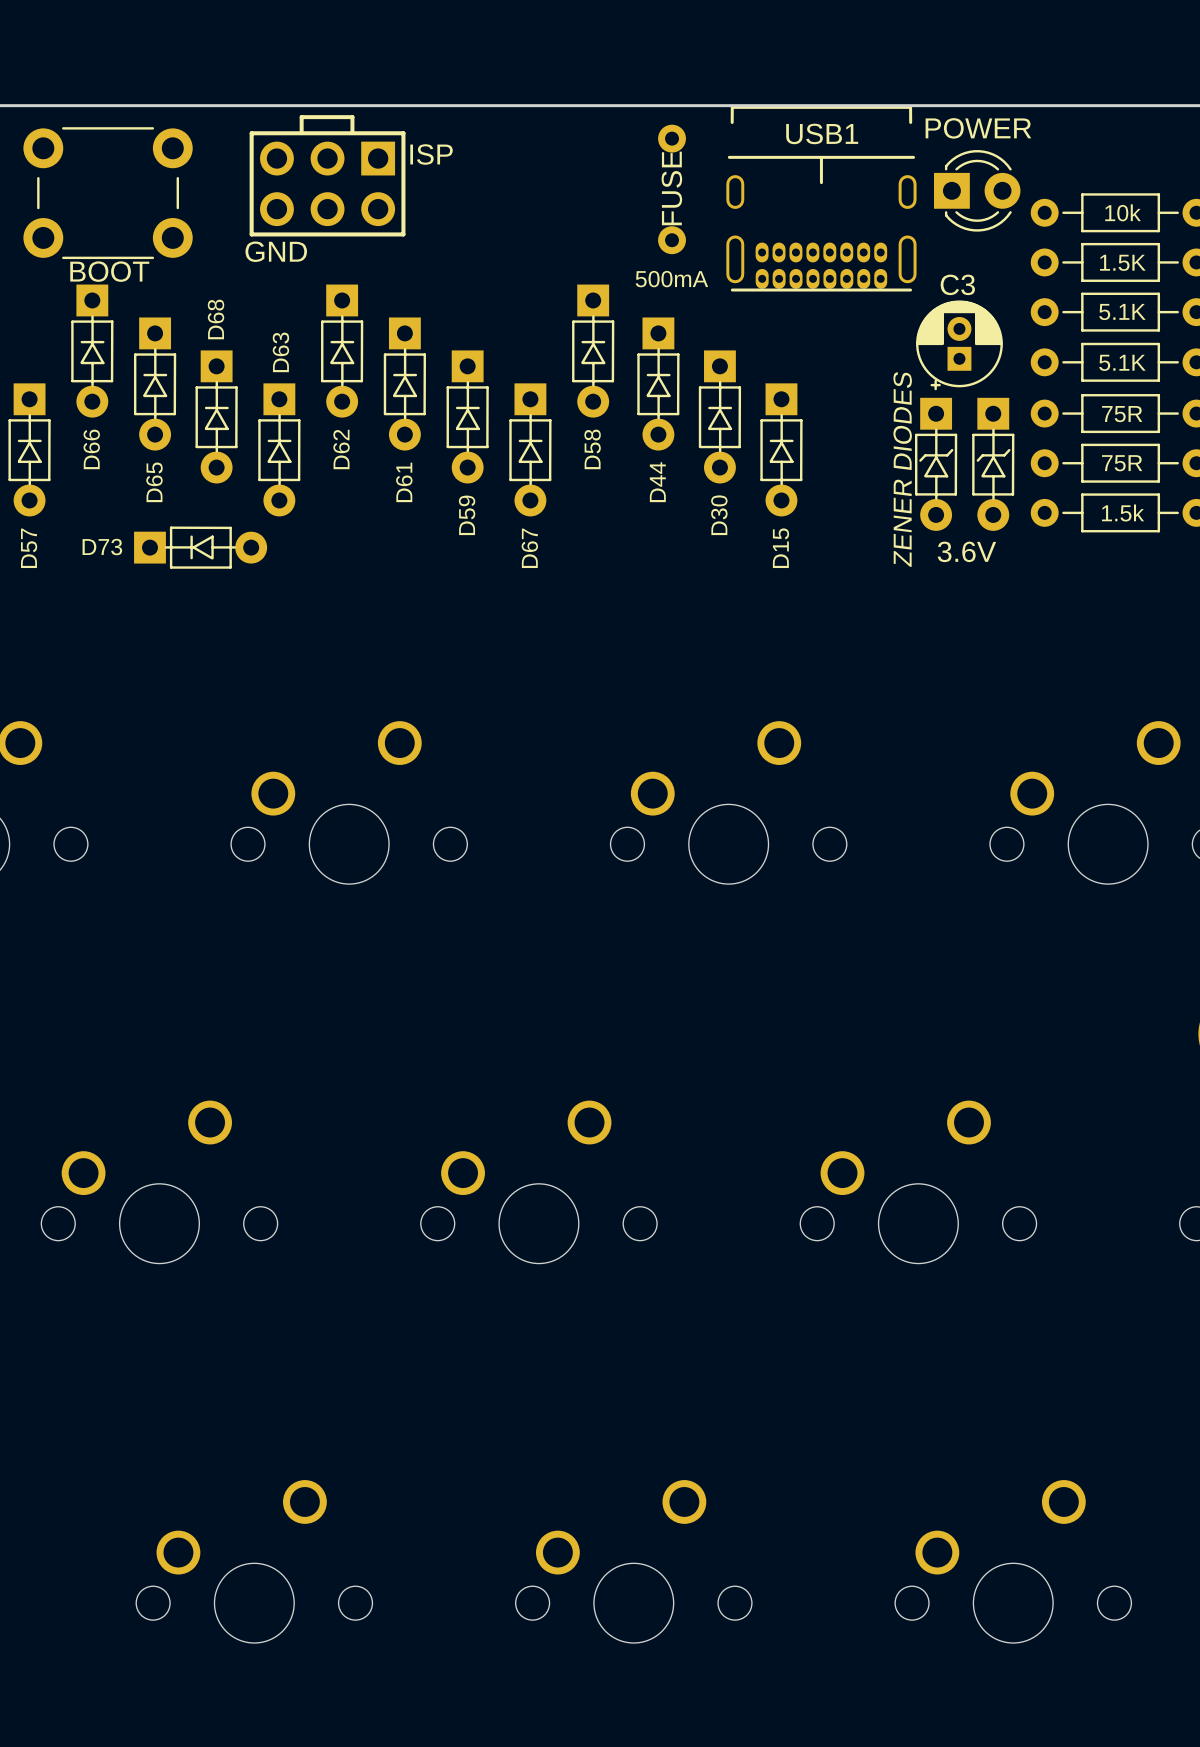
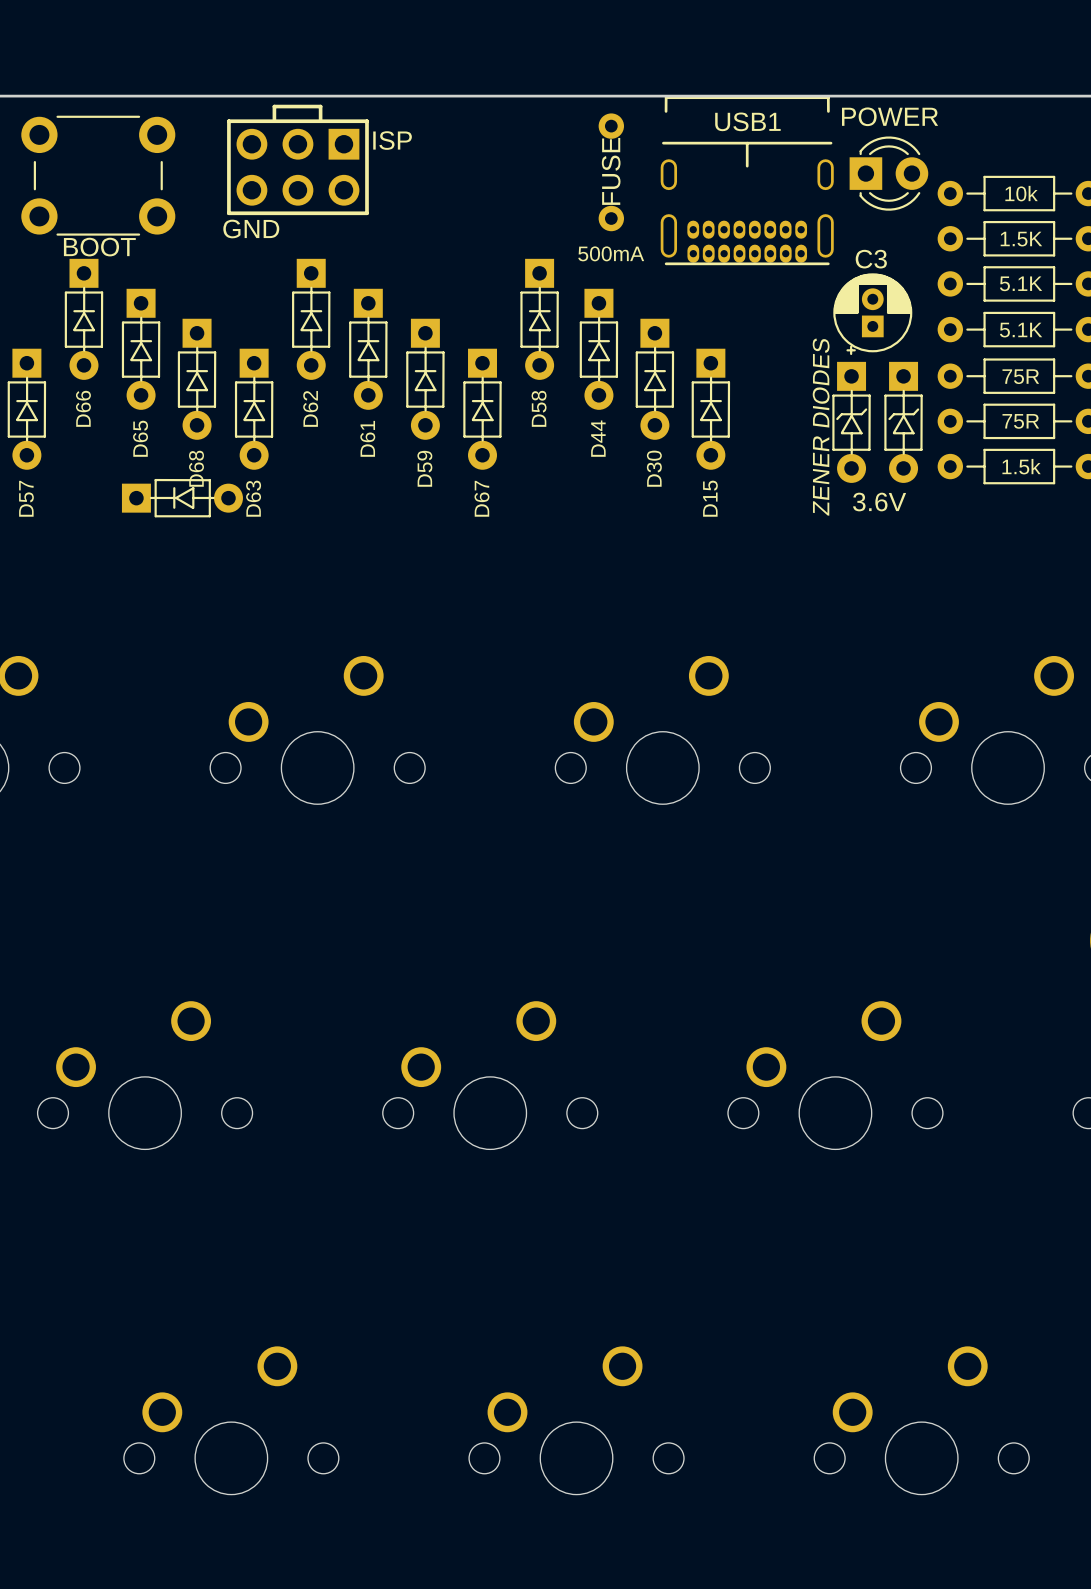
D68 name position: D68 (216, 319) -> D68 (196, 468)
D63 name position: D63 (280, 352) -> D63 (253, 498)
D73 name: D73 (102, 547) -> none

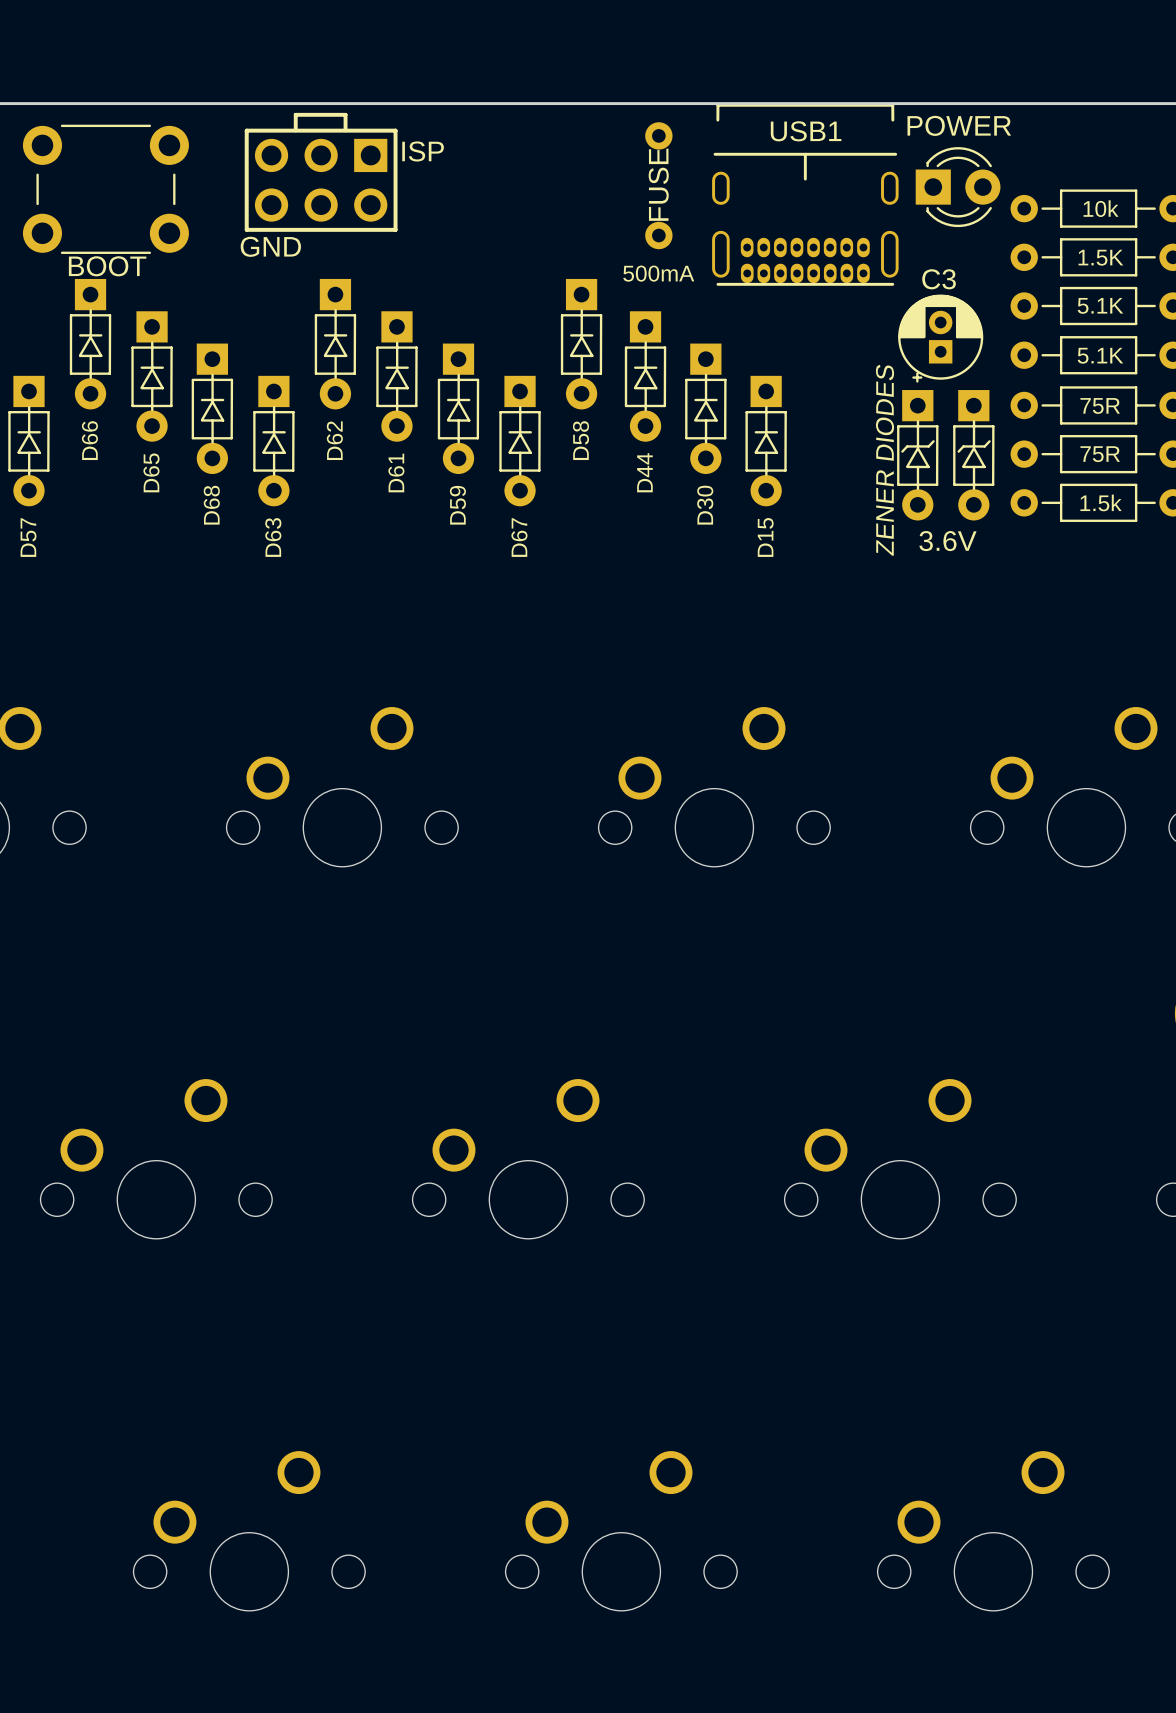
part: (182, 498) -> none

